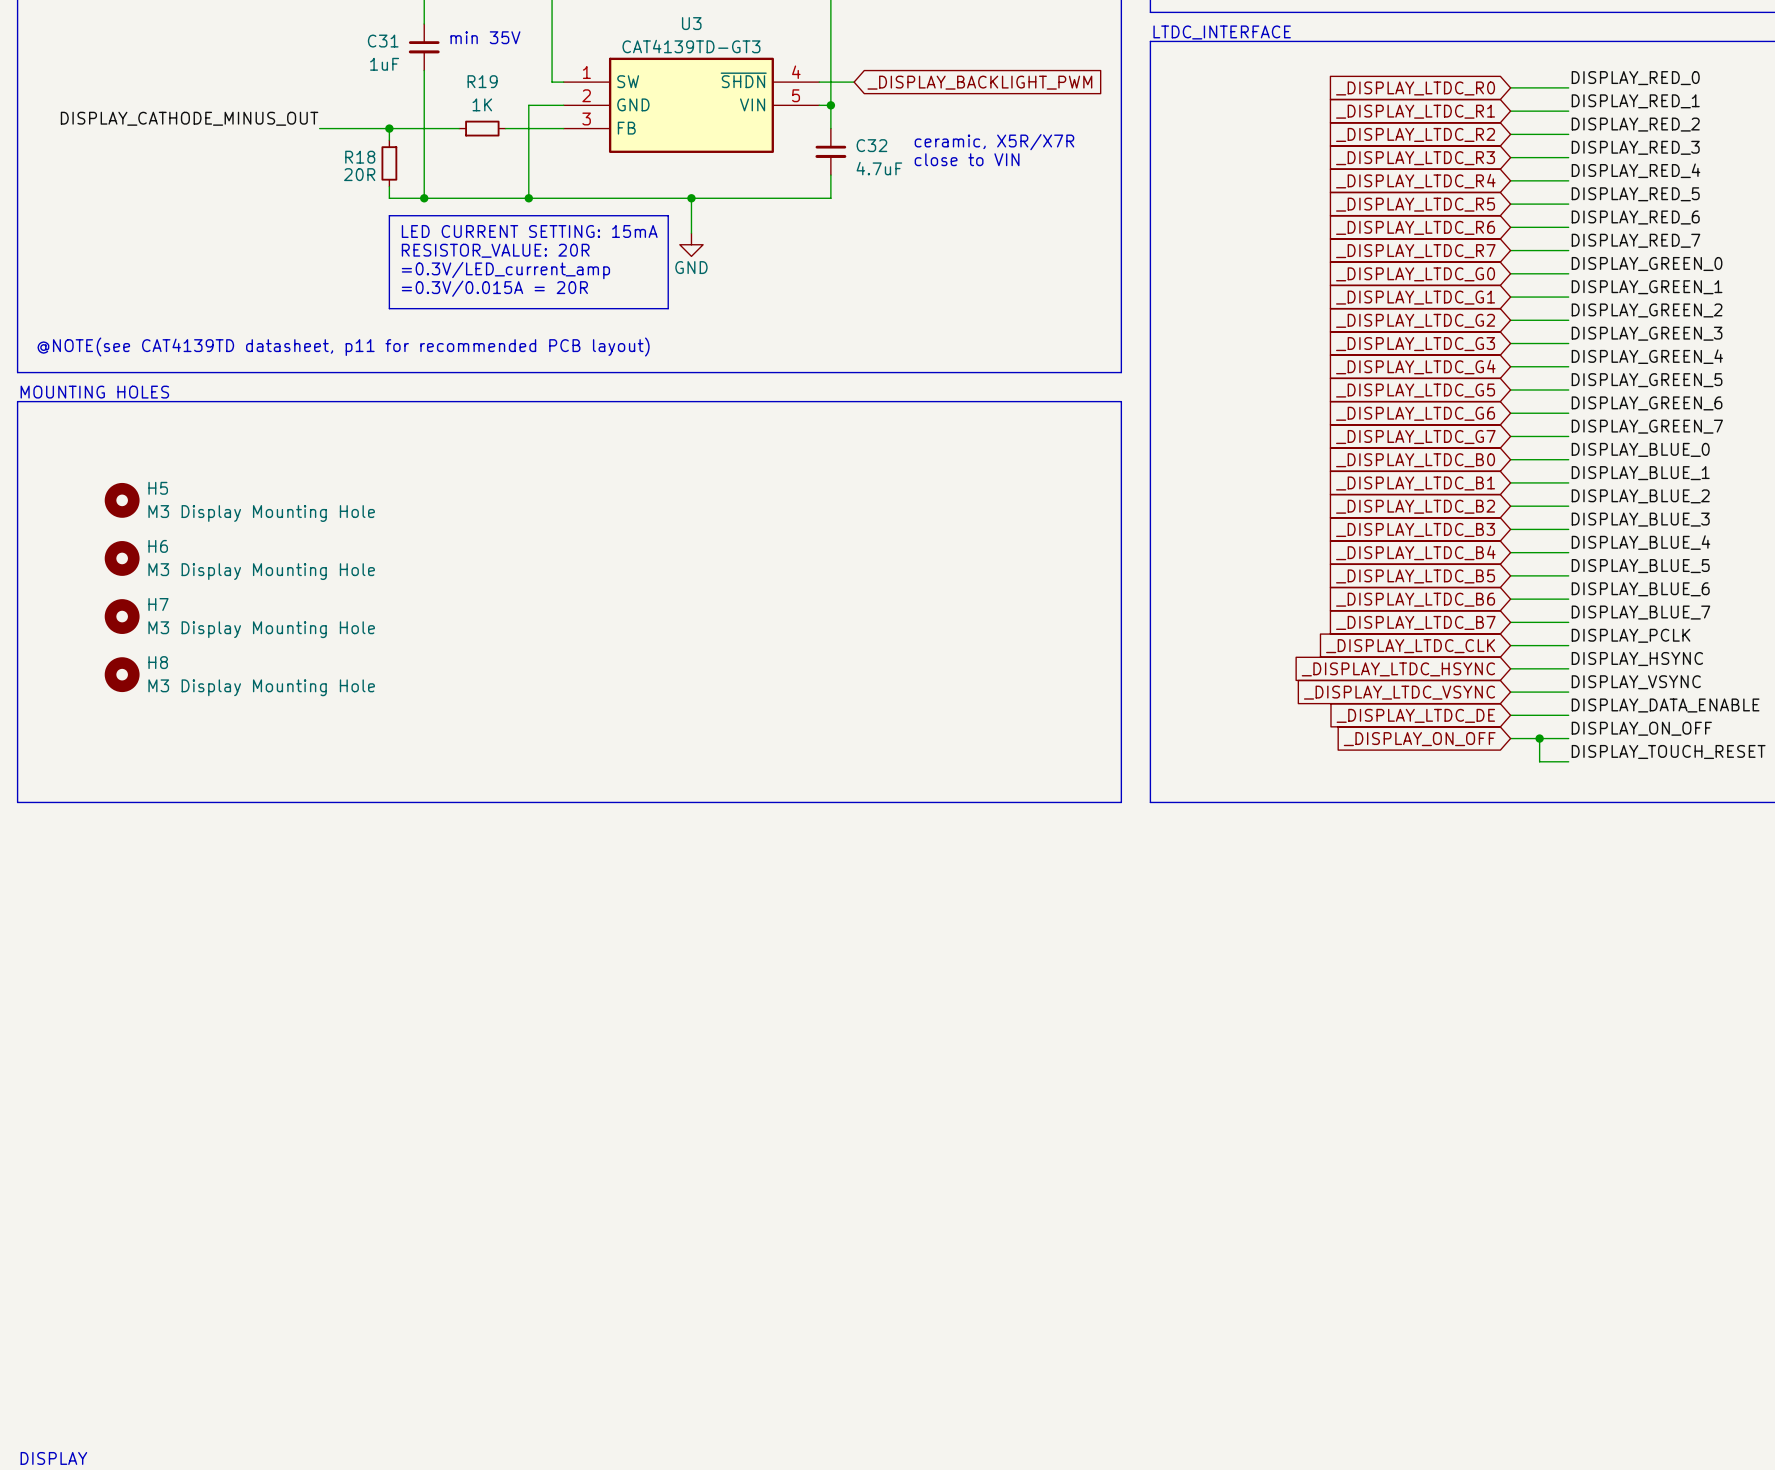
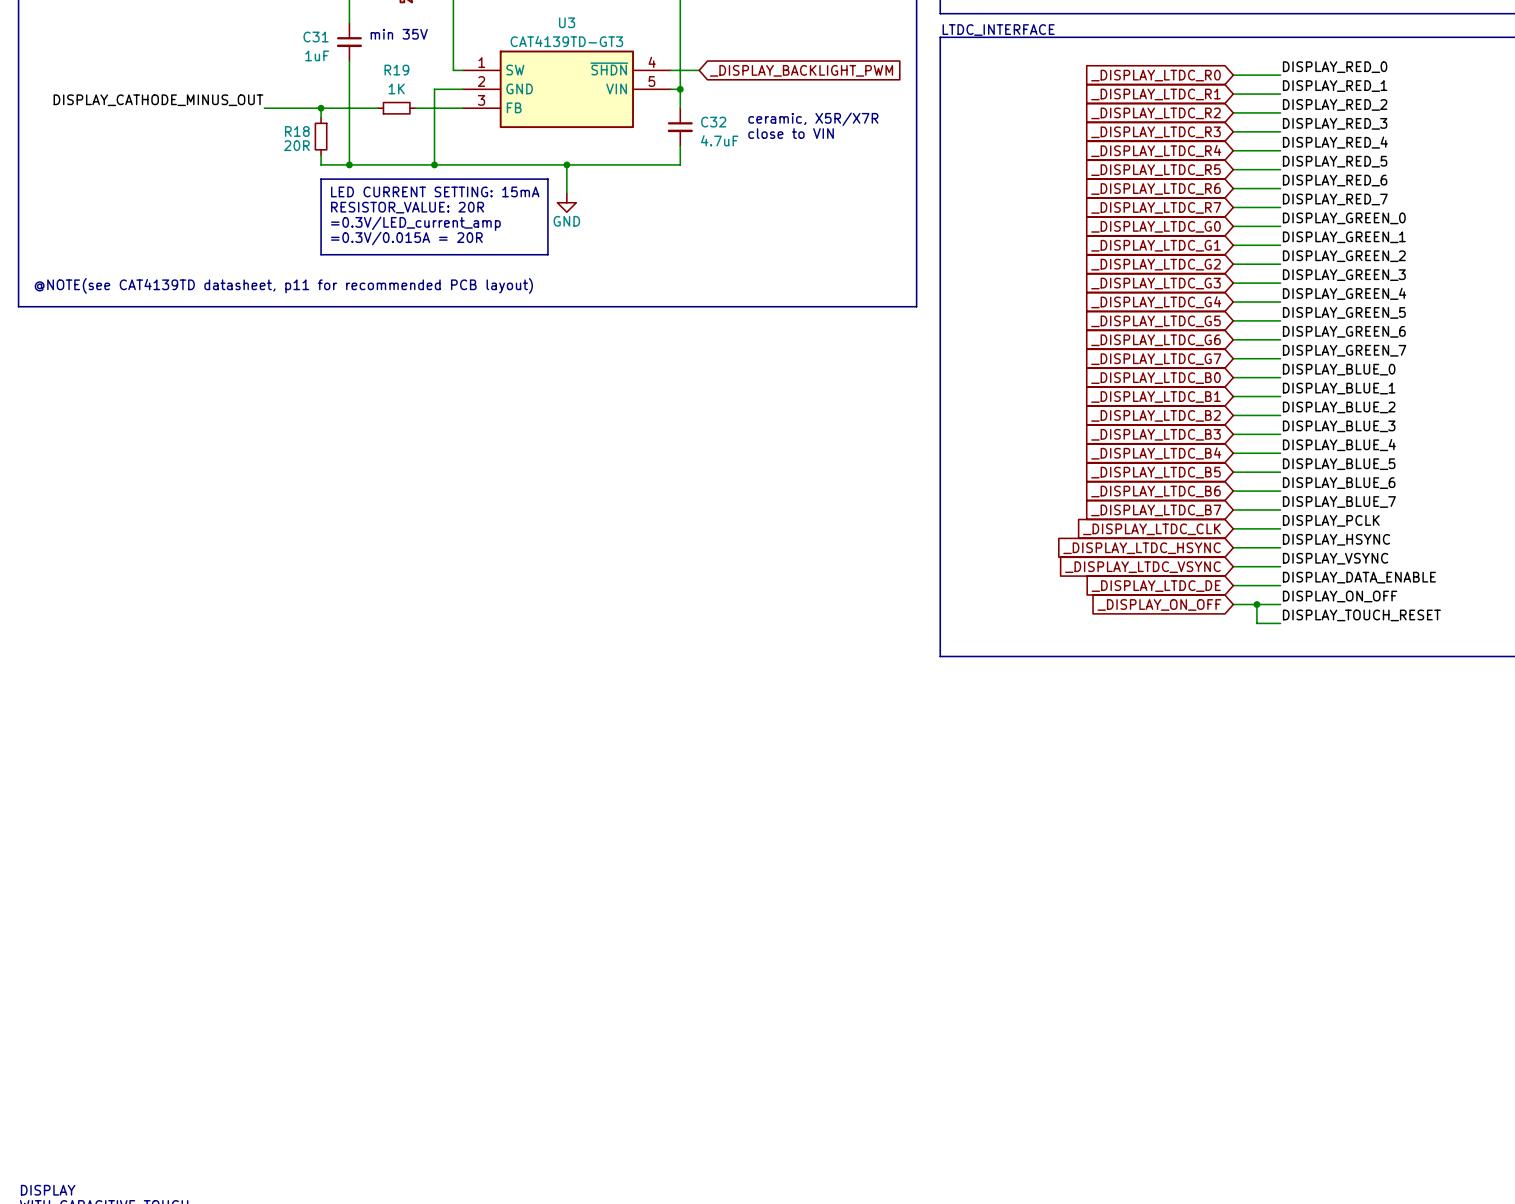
text: MOUNTING HOLES (94, 392) -> none
line: (17, 401) (1121, 401) (1121, 802) (17, 802) (17, 401) -> none
H5: M3 Display Mounting Hole (122, 500) -> none
H6: M3 Display Mounting Hole (122, 558) -> none
H7: M3 Display Mounting Hole (122, 616) -> none
H8: M3 Display Mounting Hole (122, 674) -> none

